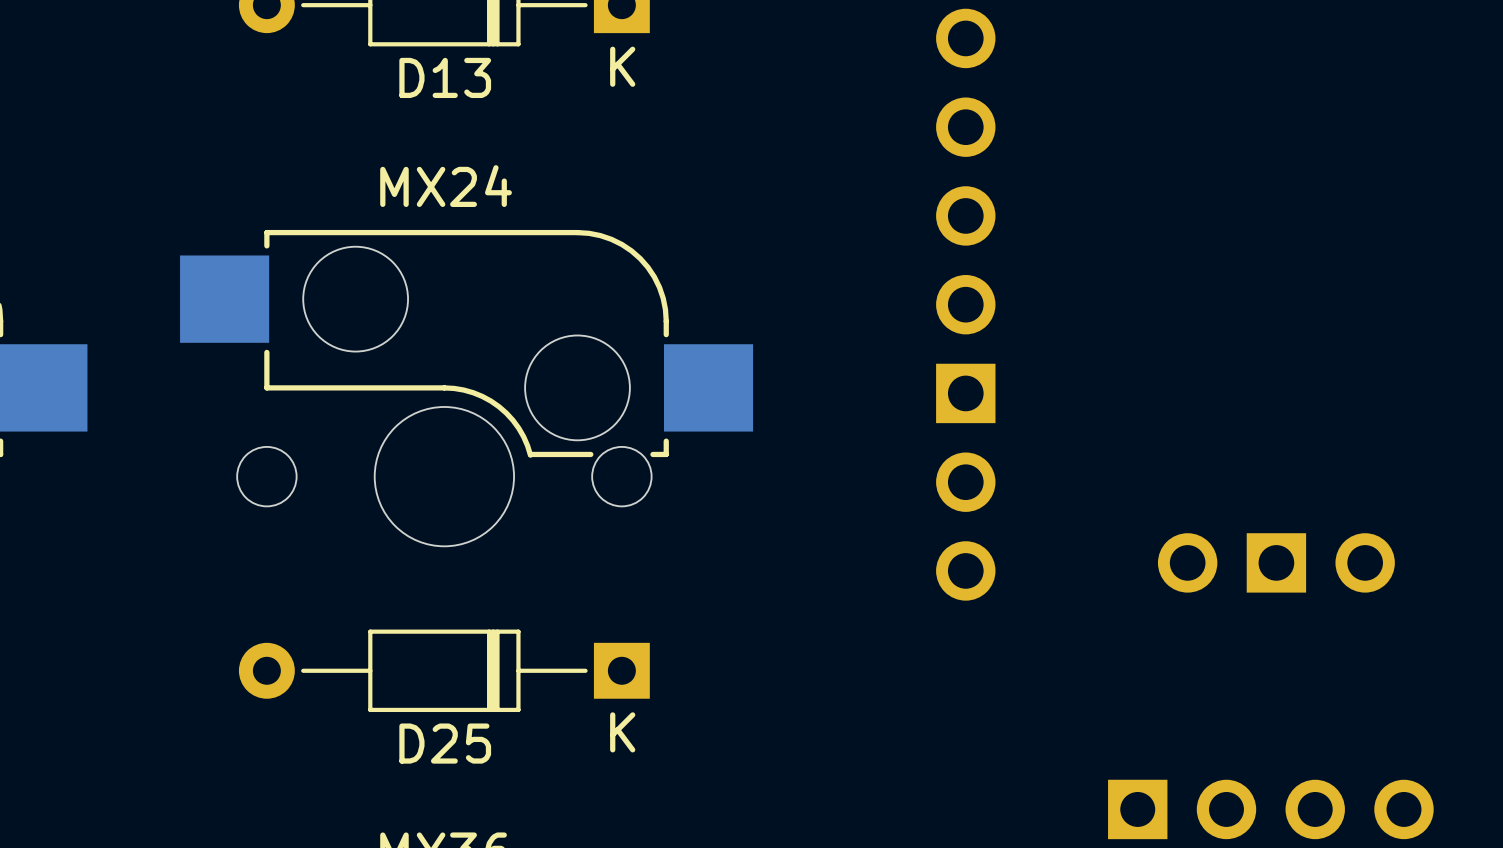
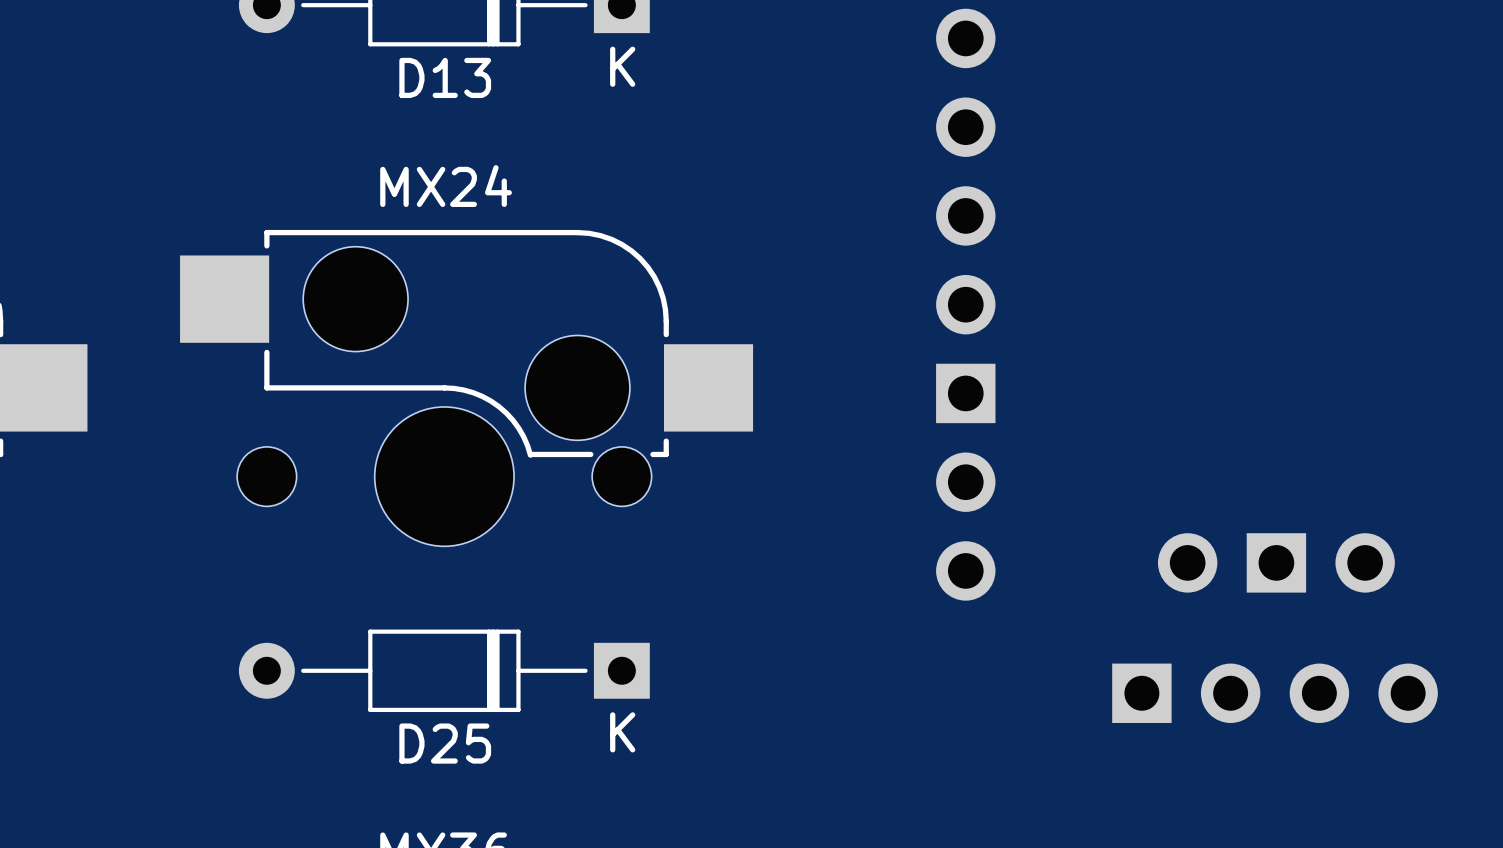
part position: (1270, 809) -> (1275, 693)

